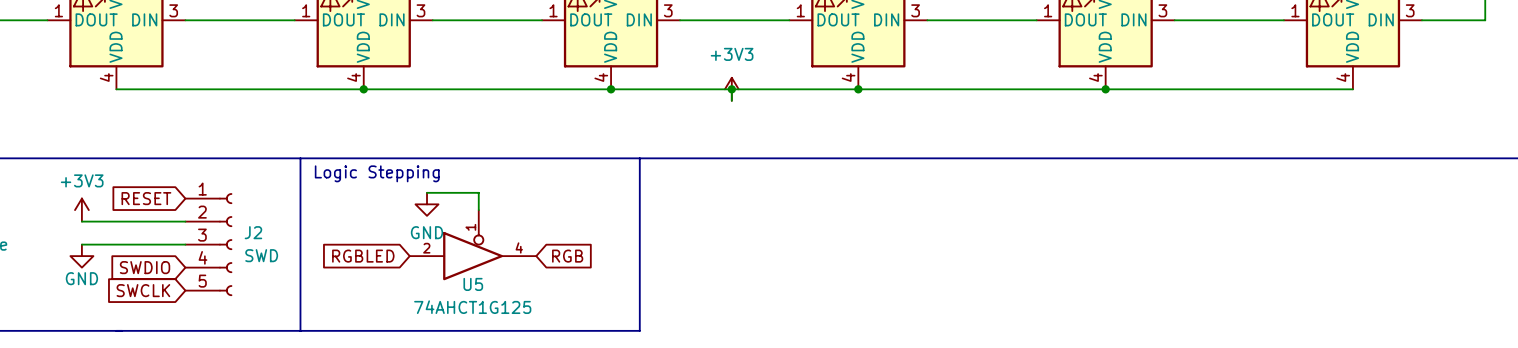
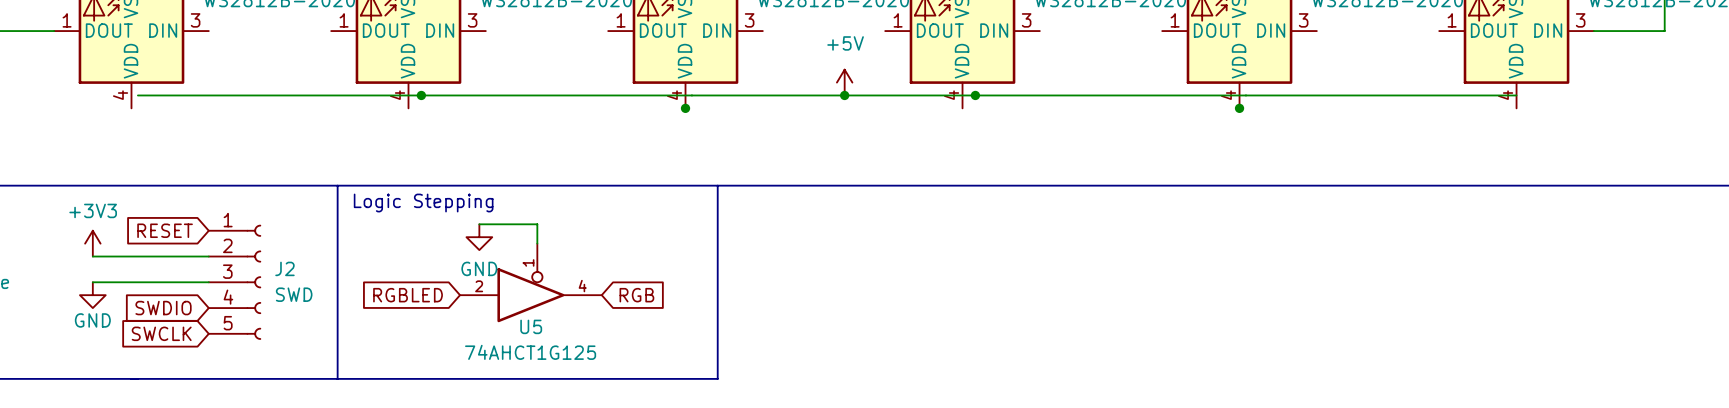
wire: (185, 20) (294, 20) -> none
wire: (432, 20) (542, 20) -> none
wire: (680, 20) (789, 20) -> none
wire: (927, 20) (1036, 20) -> none
wire: (1174, 20) (1283, 20) -> none
power symbol: none -> +5V (844, 82)
wire: none -> (137, 95) (1516, 95)
wire: (116, 89) (1352, 89) -> none
junction position: (363, 89) -> (421, 95)
wire: (731, 89) (731, 100) -> none
junction position: (731, 89) -> (844, 95)
power symbol: +3V3 (731, 89) -> none
junction position: (858, 89) -> (975, 95)

